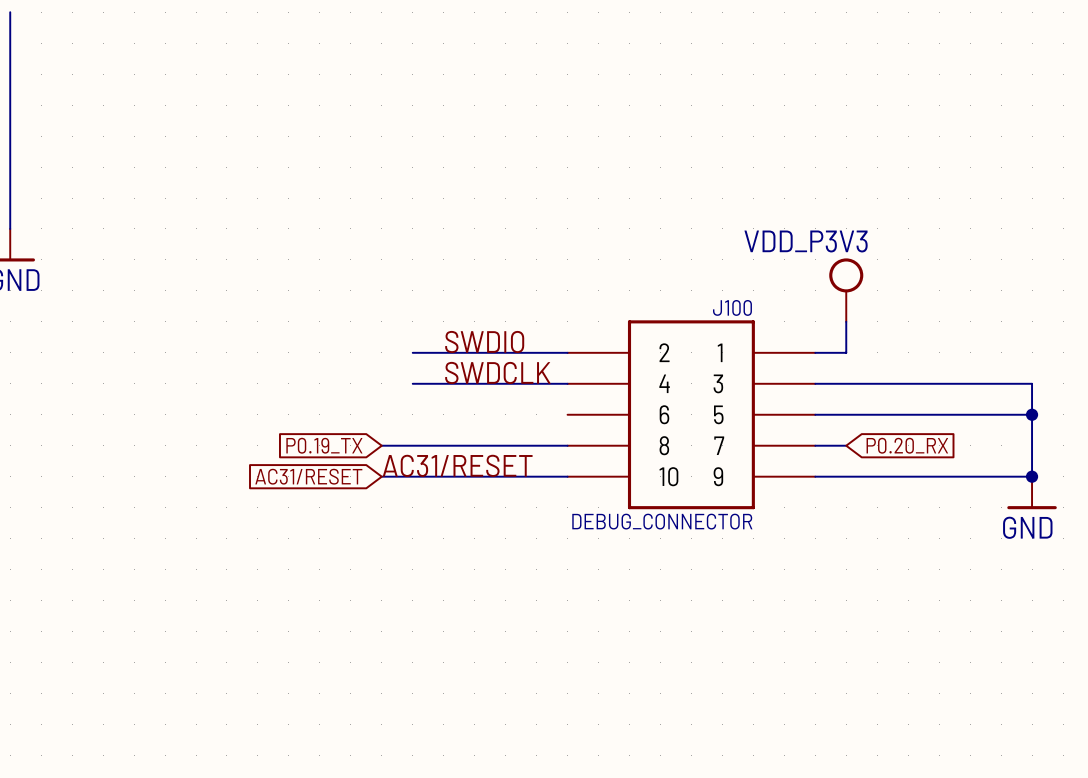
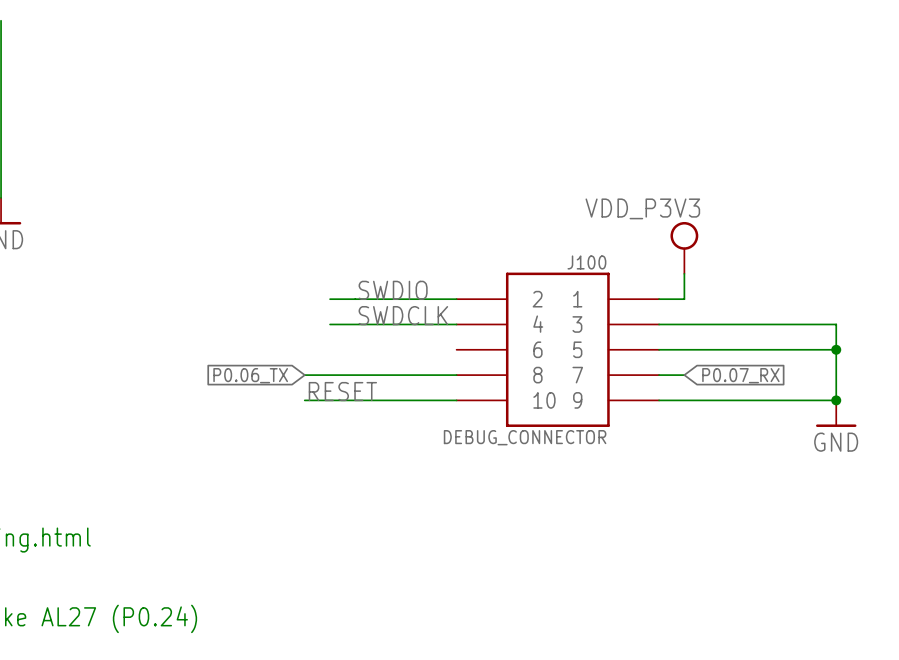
global label: P0.19_TX (324, 445) -> P0.06_TX (250, 375)
global label: P0.20_RX (907, 445) -> P0.07_RX (740, 375)
label: AC31/RESET (457, 465) -> RESET (342, 391)
global label: AC31/RESET (308, 476) -> none

